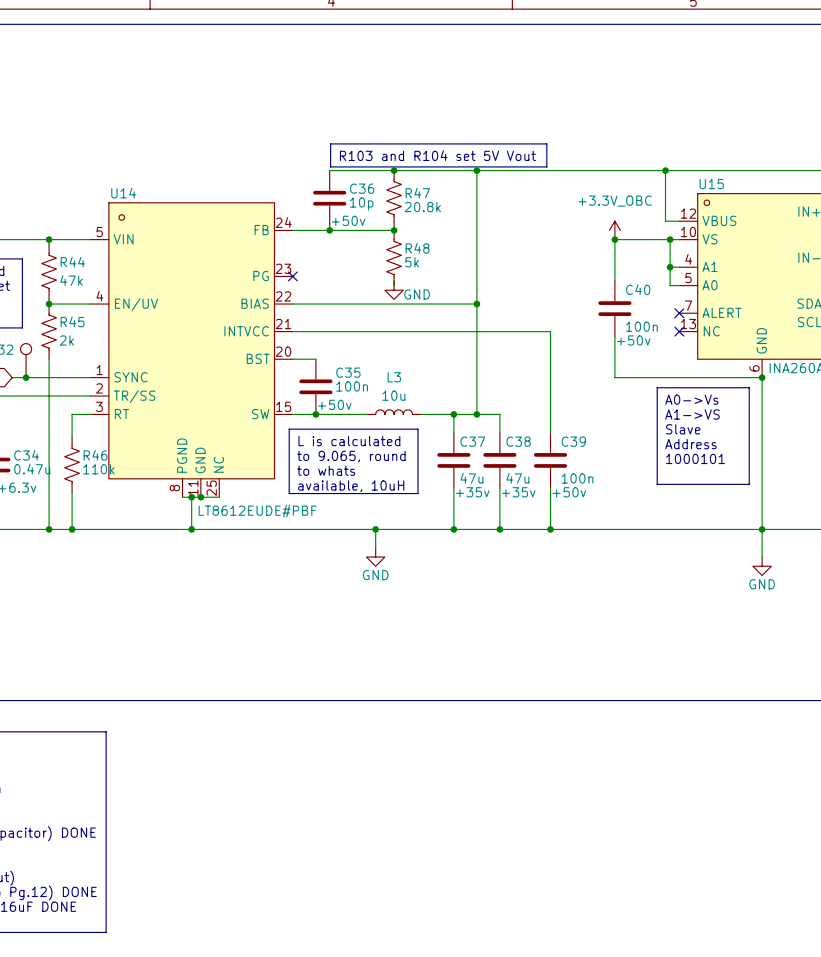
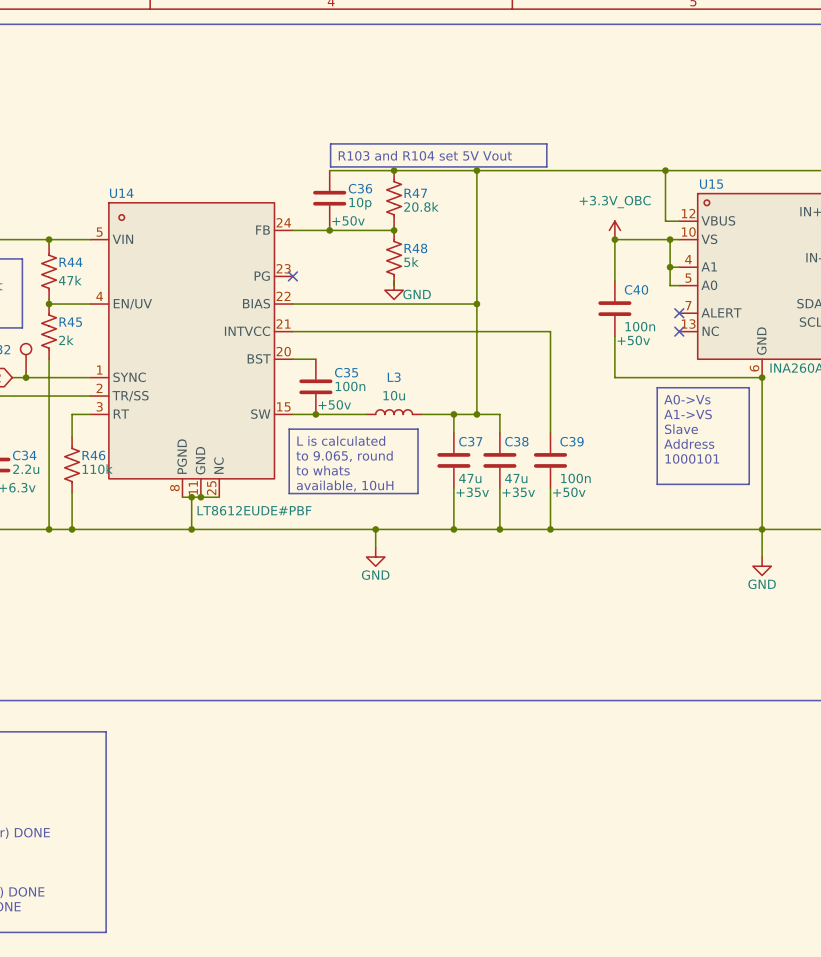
C34 value: 0.47u (32, 469) -> 2.2u (26, 469)

